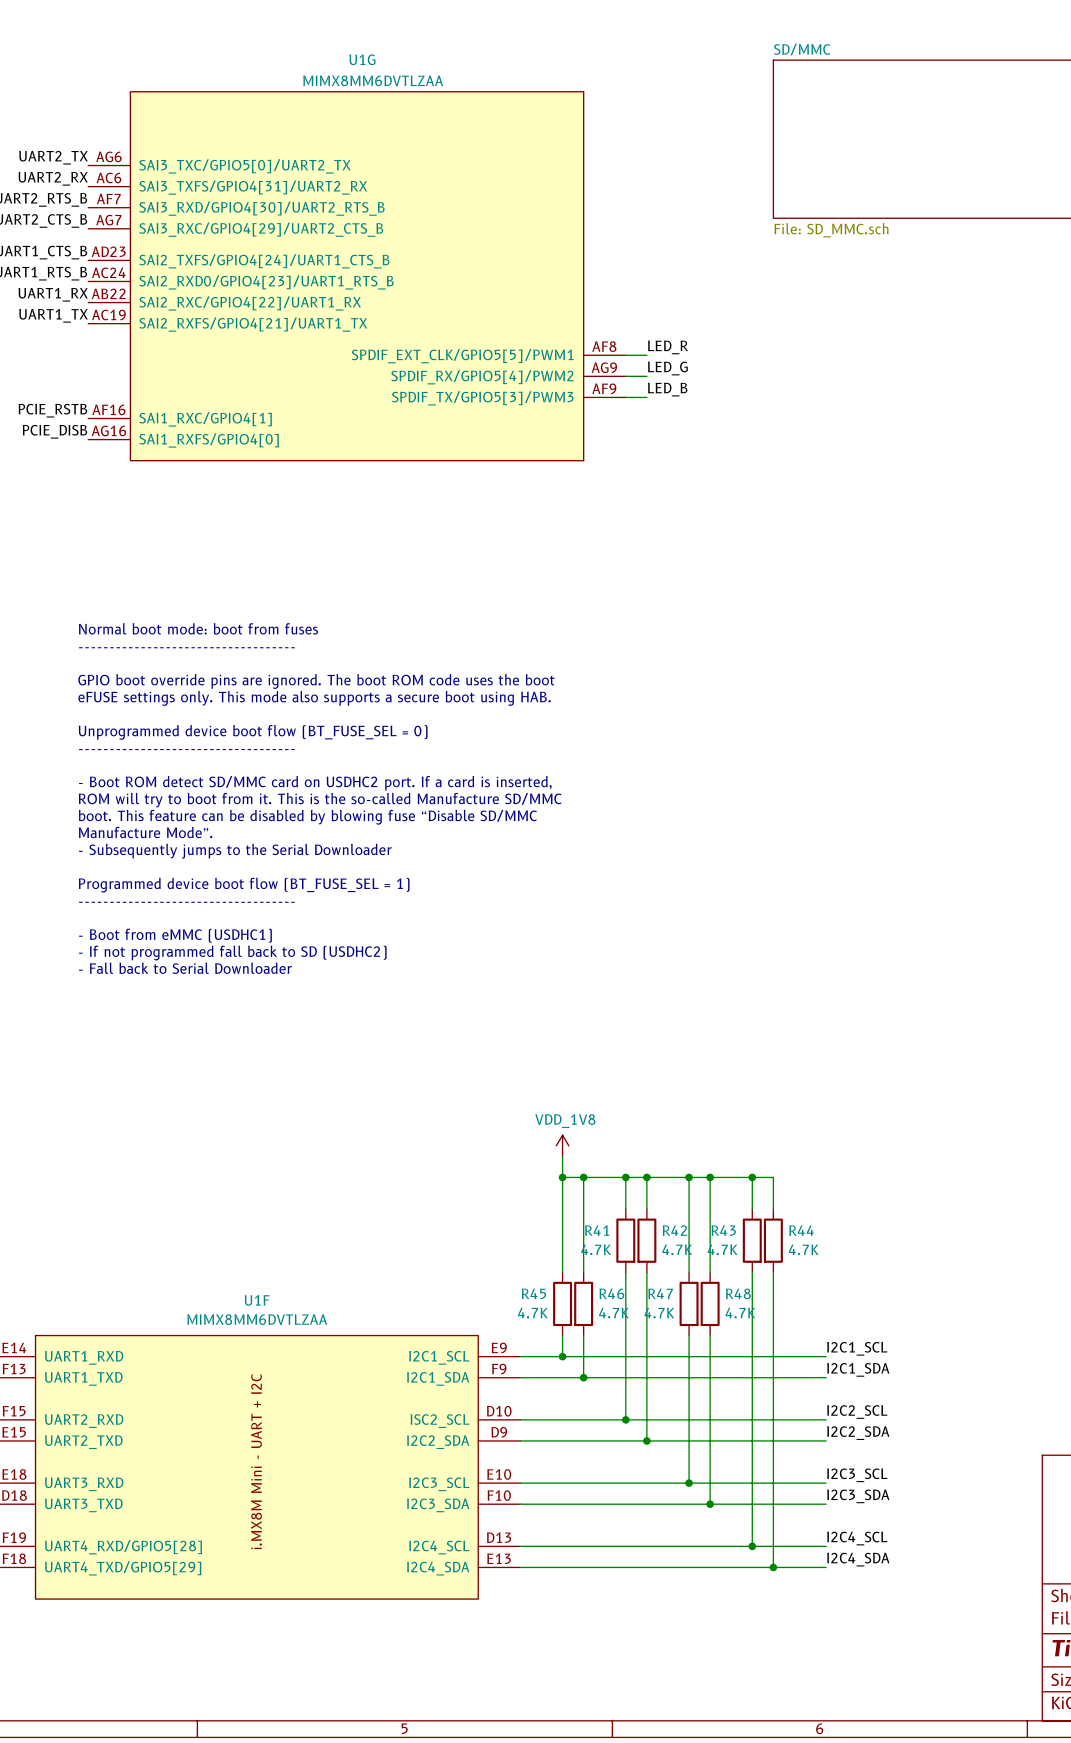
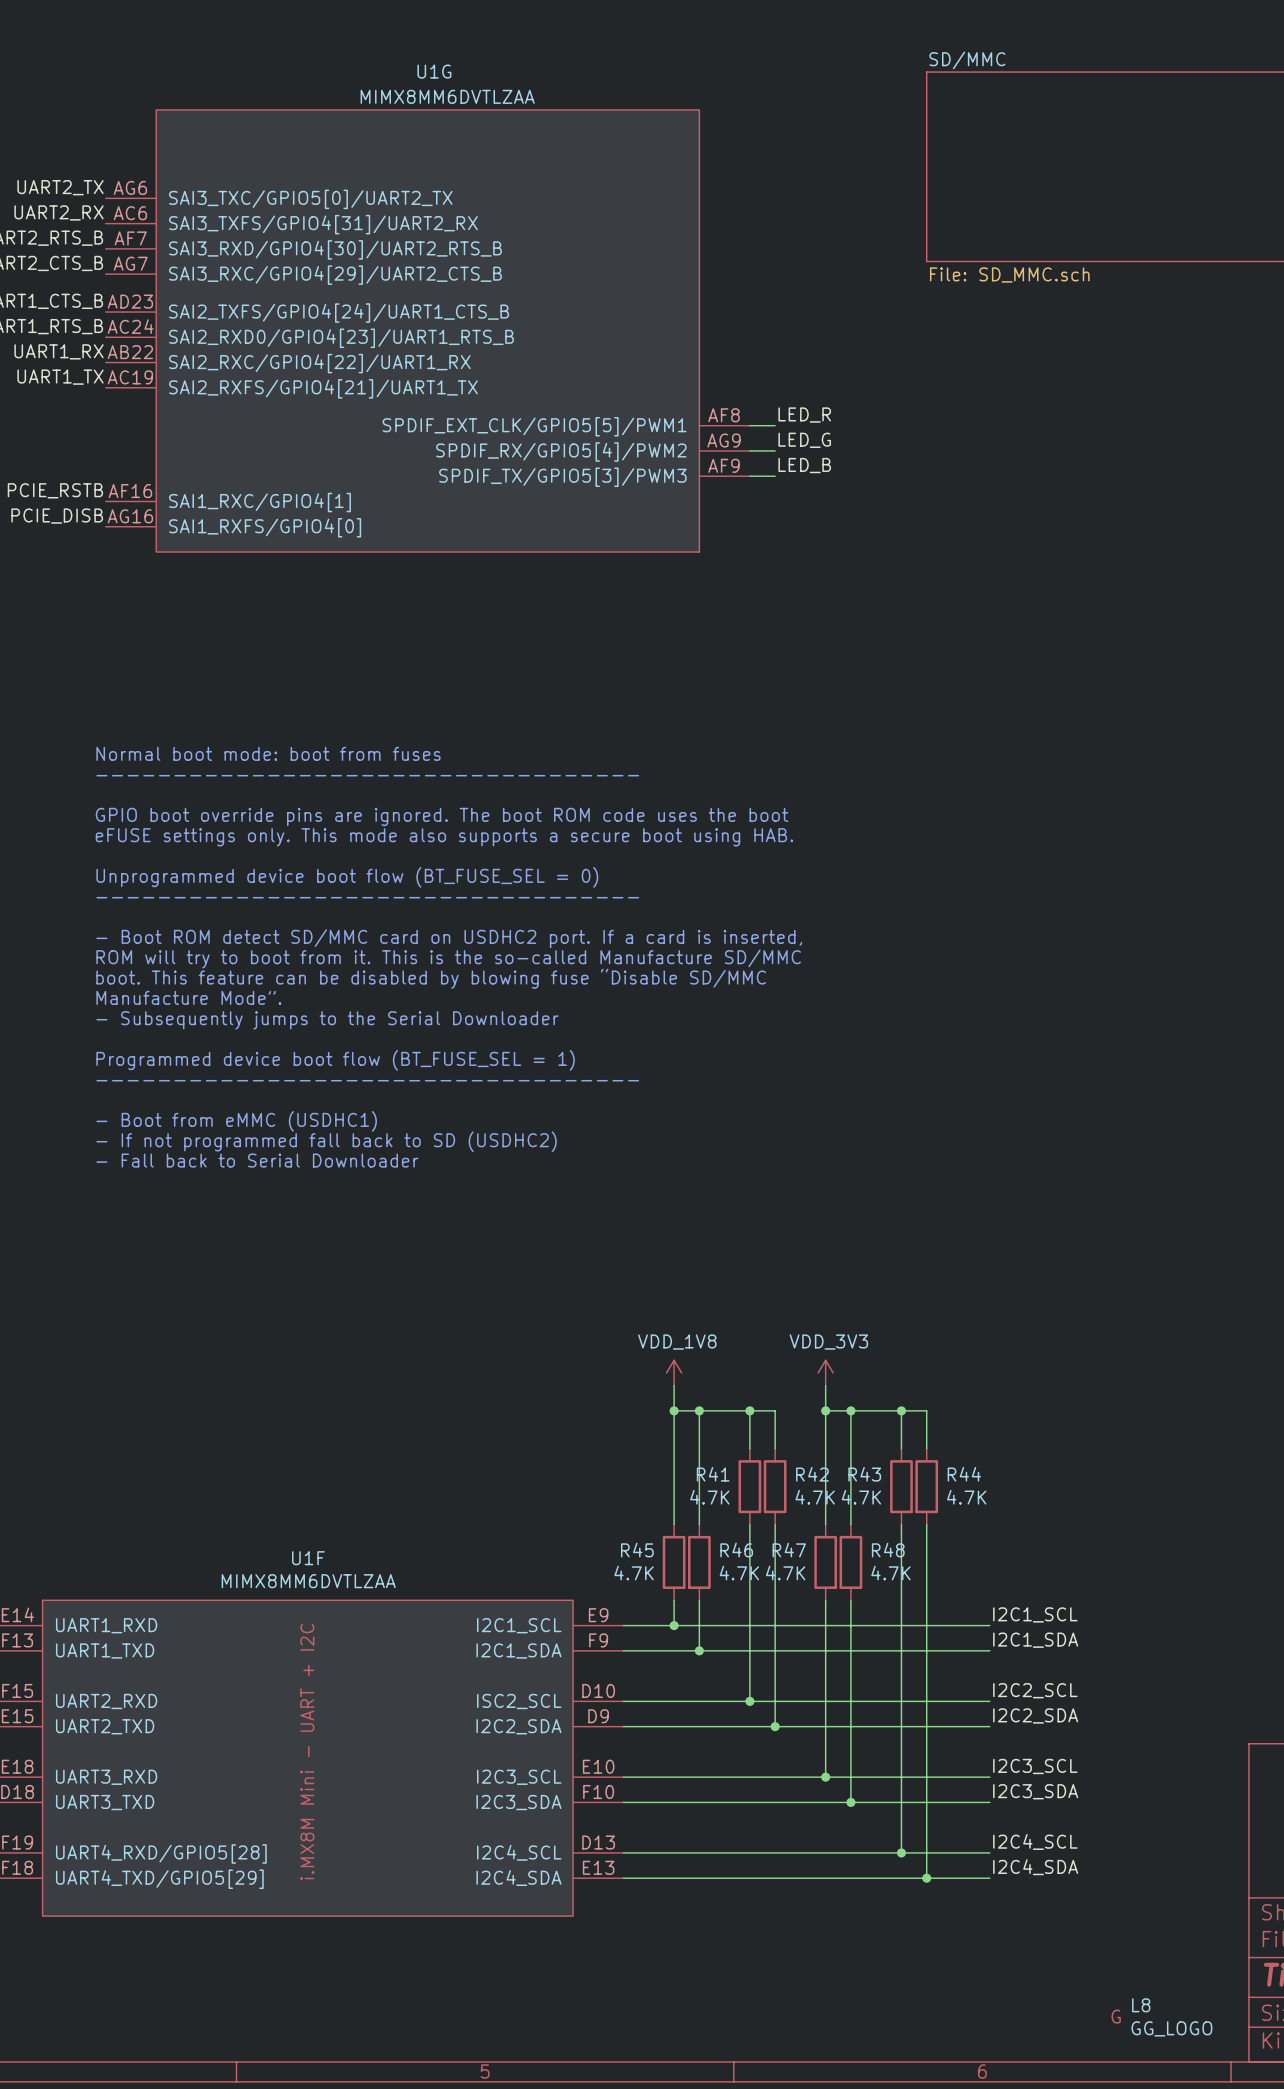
power symbol: none -> VDD_3V3 (825, 1372)
wire: (646, 1177) (689, 1177) -> (825, 1385) (825, 1410)
junction: (646, 1177) -> none
L8: none -> GG_LOGO (1161, 2017)

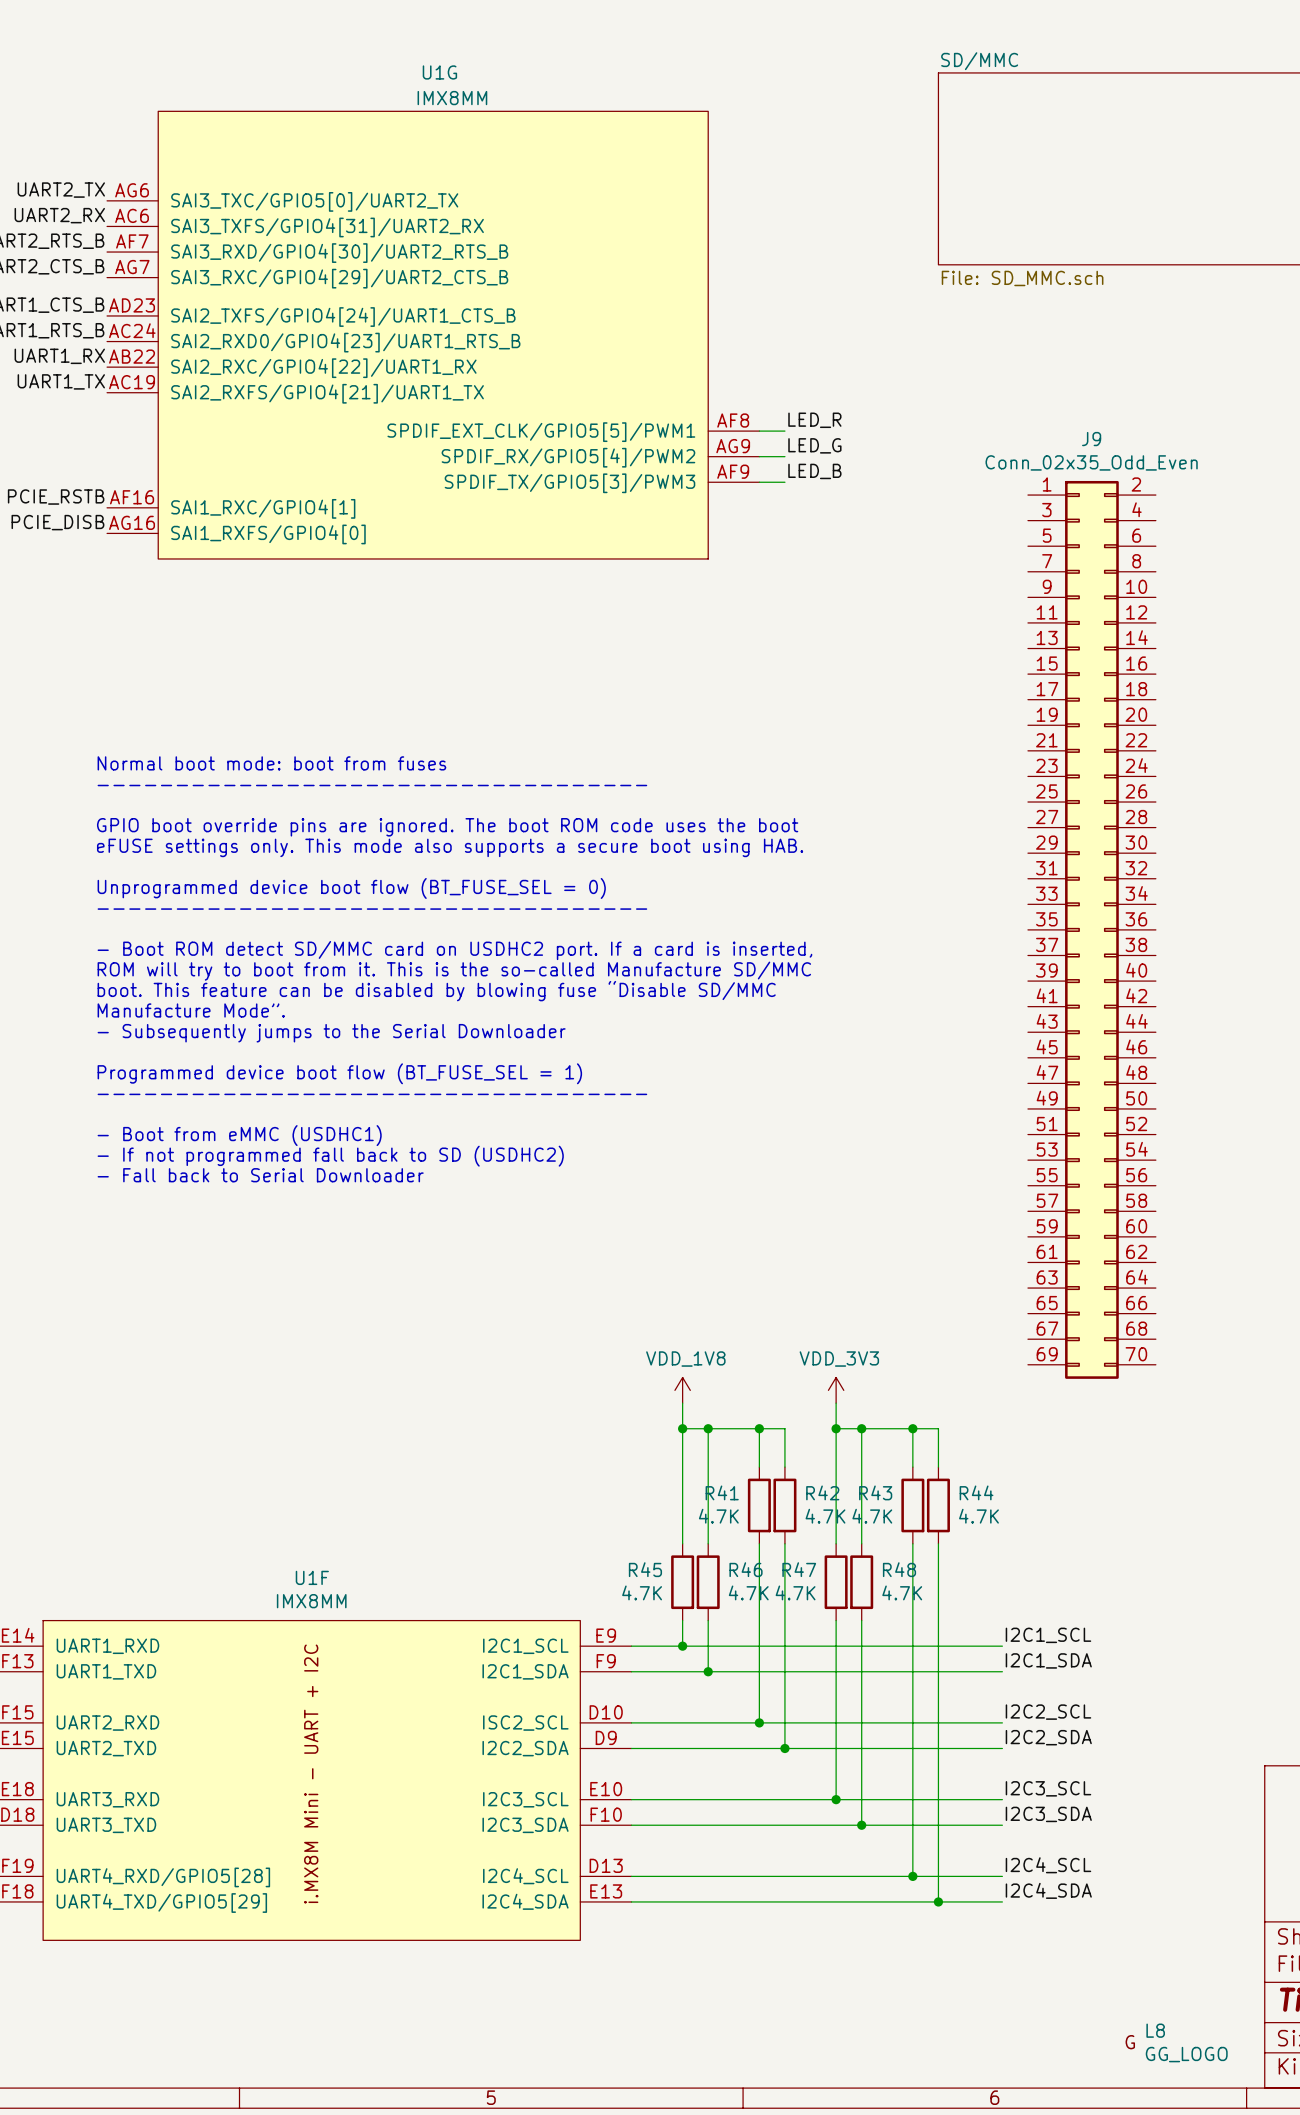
U1G value: MIMX8MM6DVTLZAA (447, 96) -> IMX8MM (452, 98)
J9: none -> Conn_02x35_Odd_Even (1091, 929)
U1F value: MIMX8MM6DVTLZAA (308, 1581) -> IMX8MM (311, 1601)

